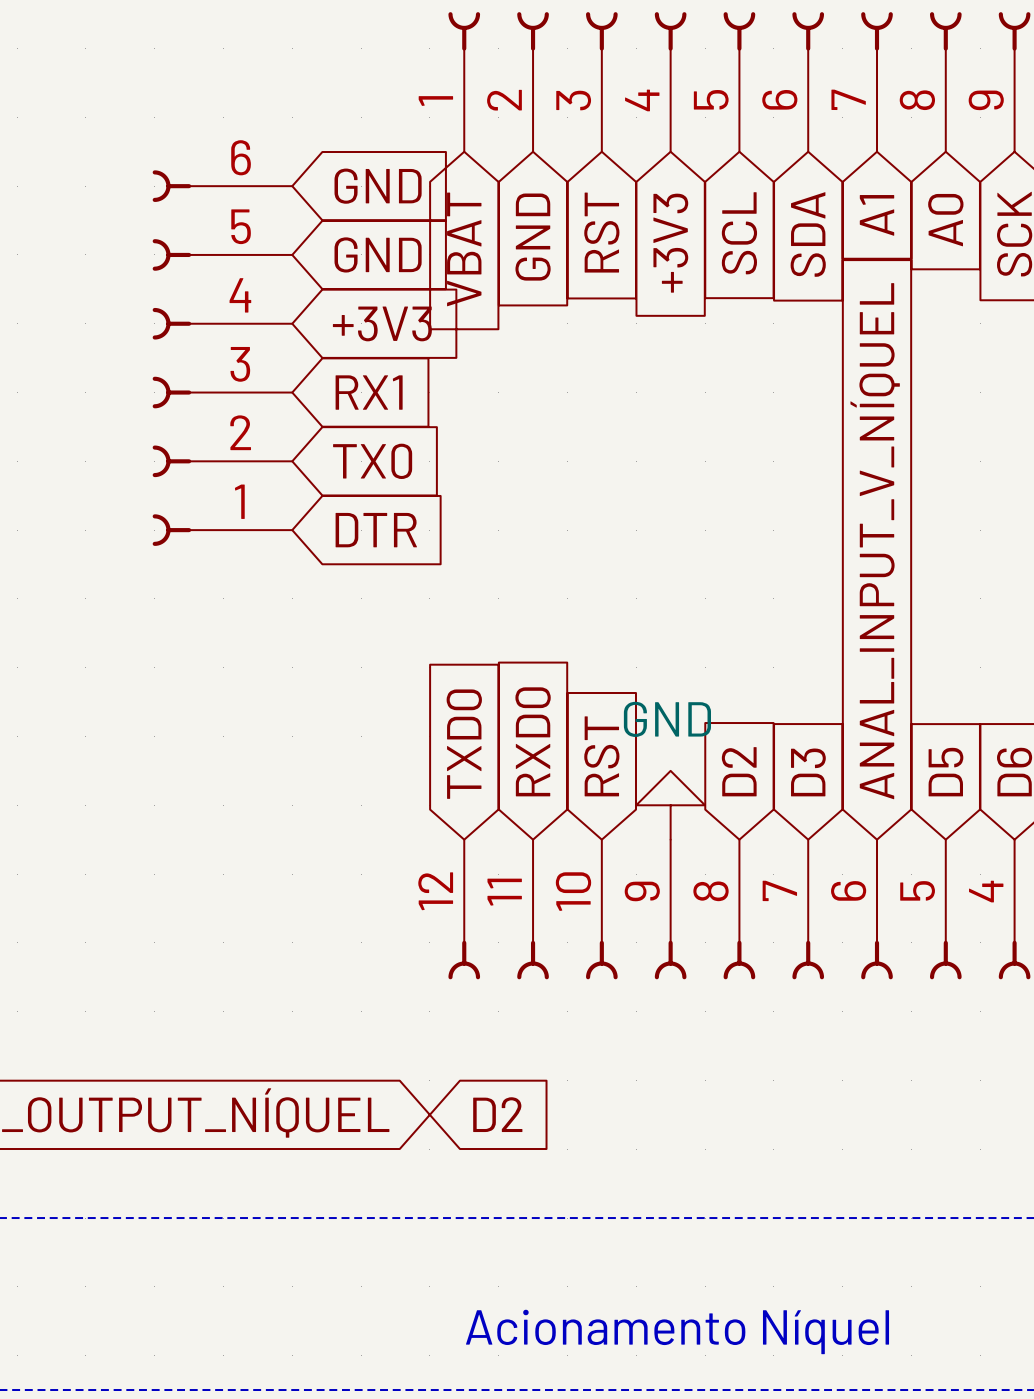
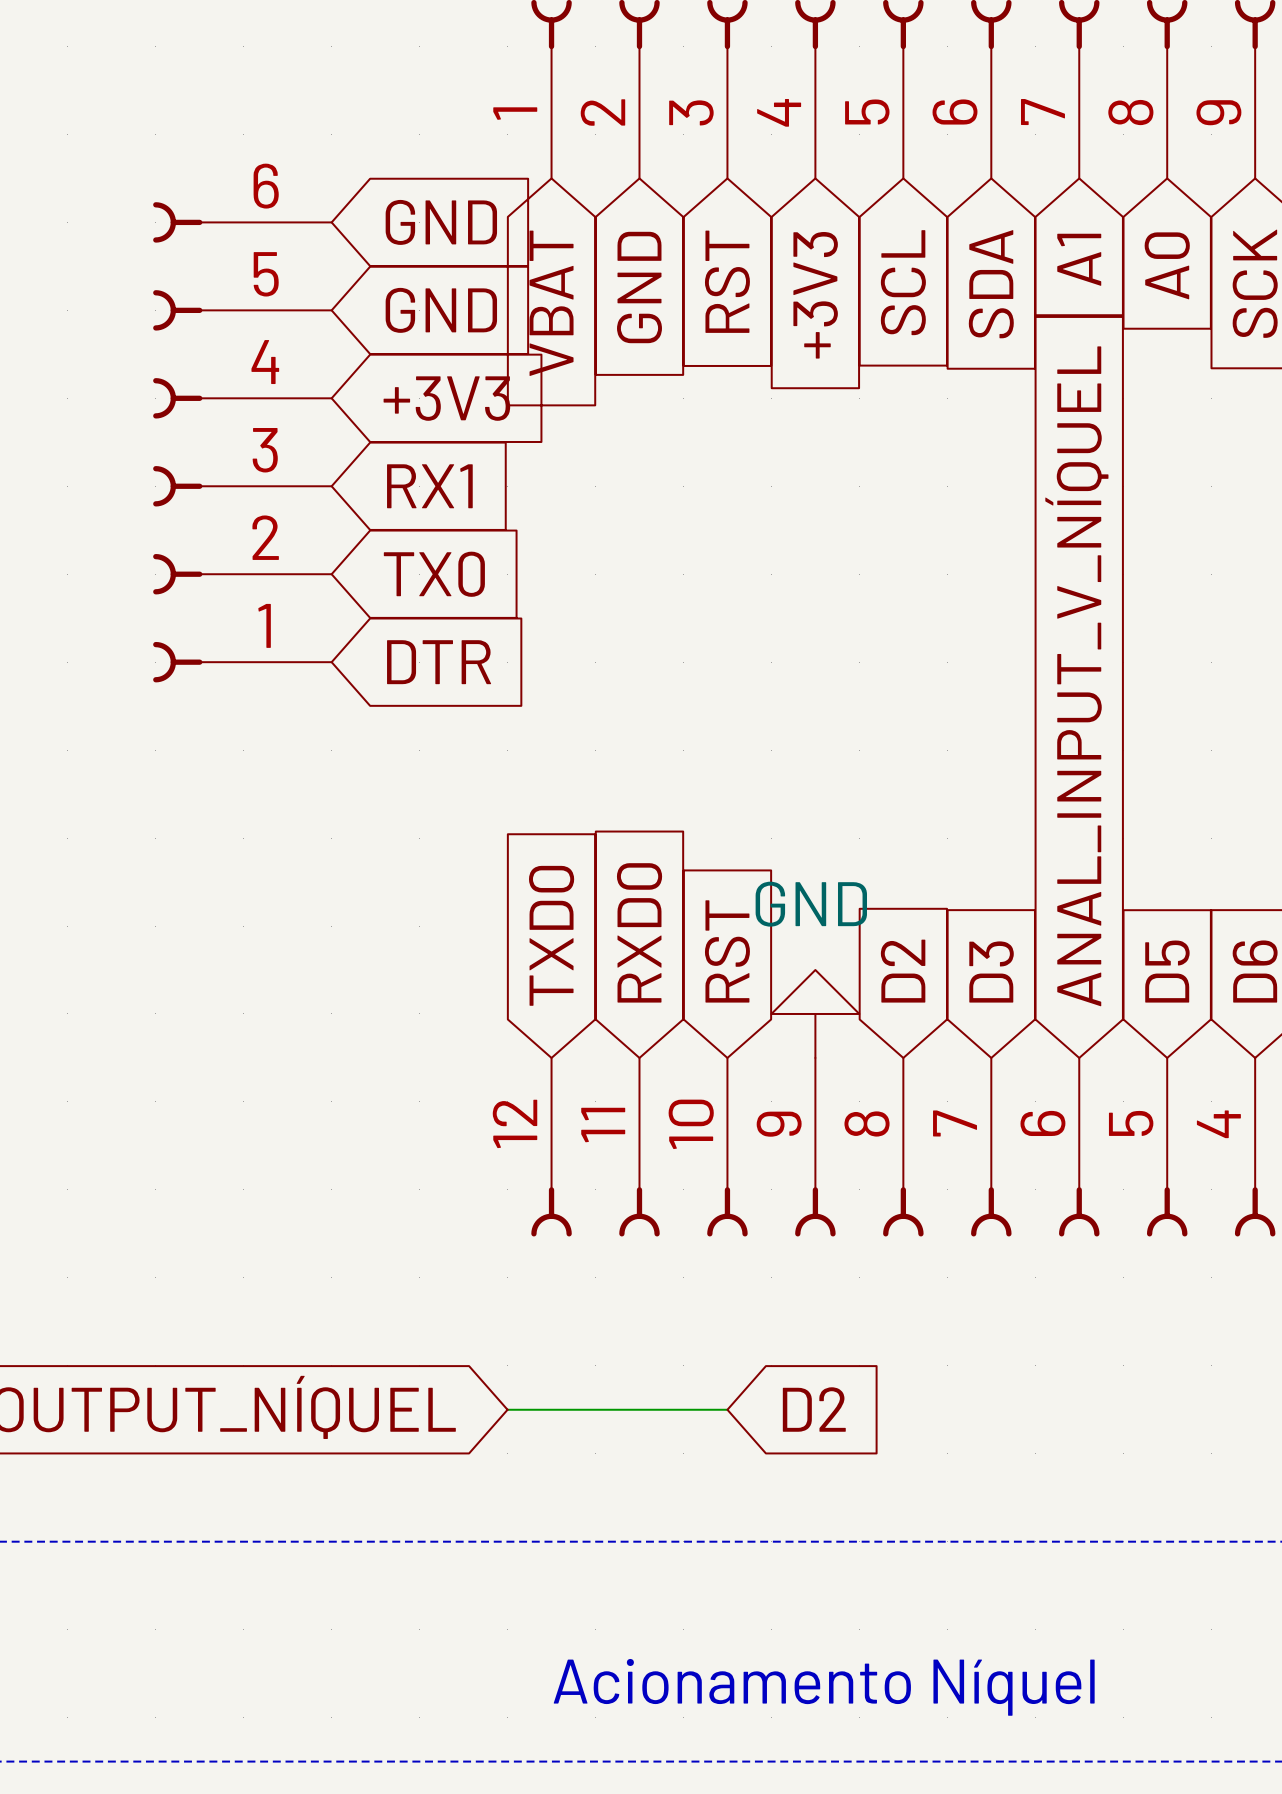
wire: none -> (507, 1409) (727, 1409)
global label position: D2 (497, 1114) -> D2 (814, 1409)

